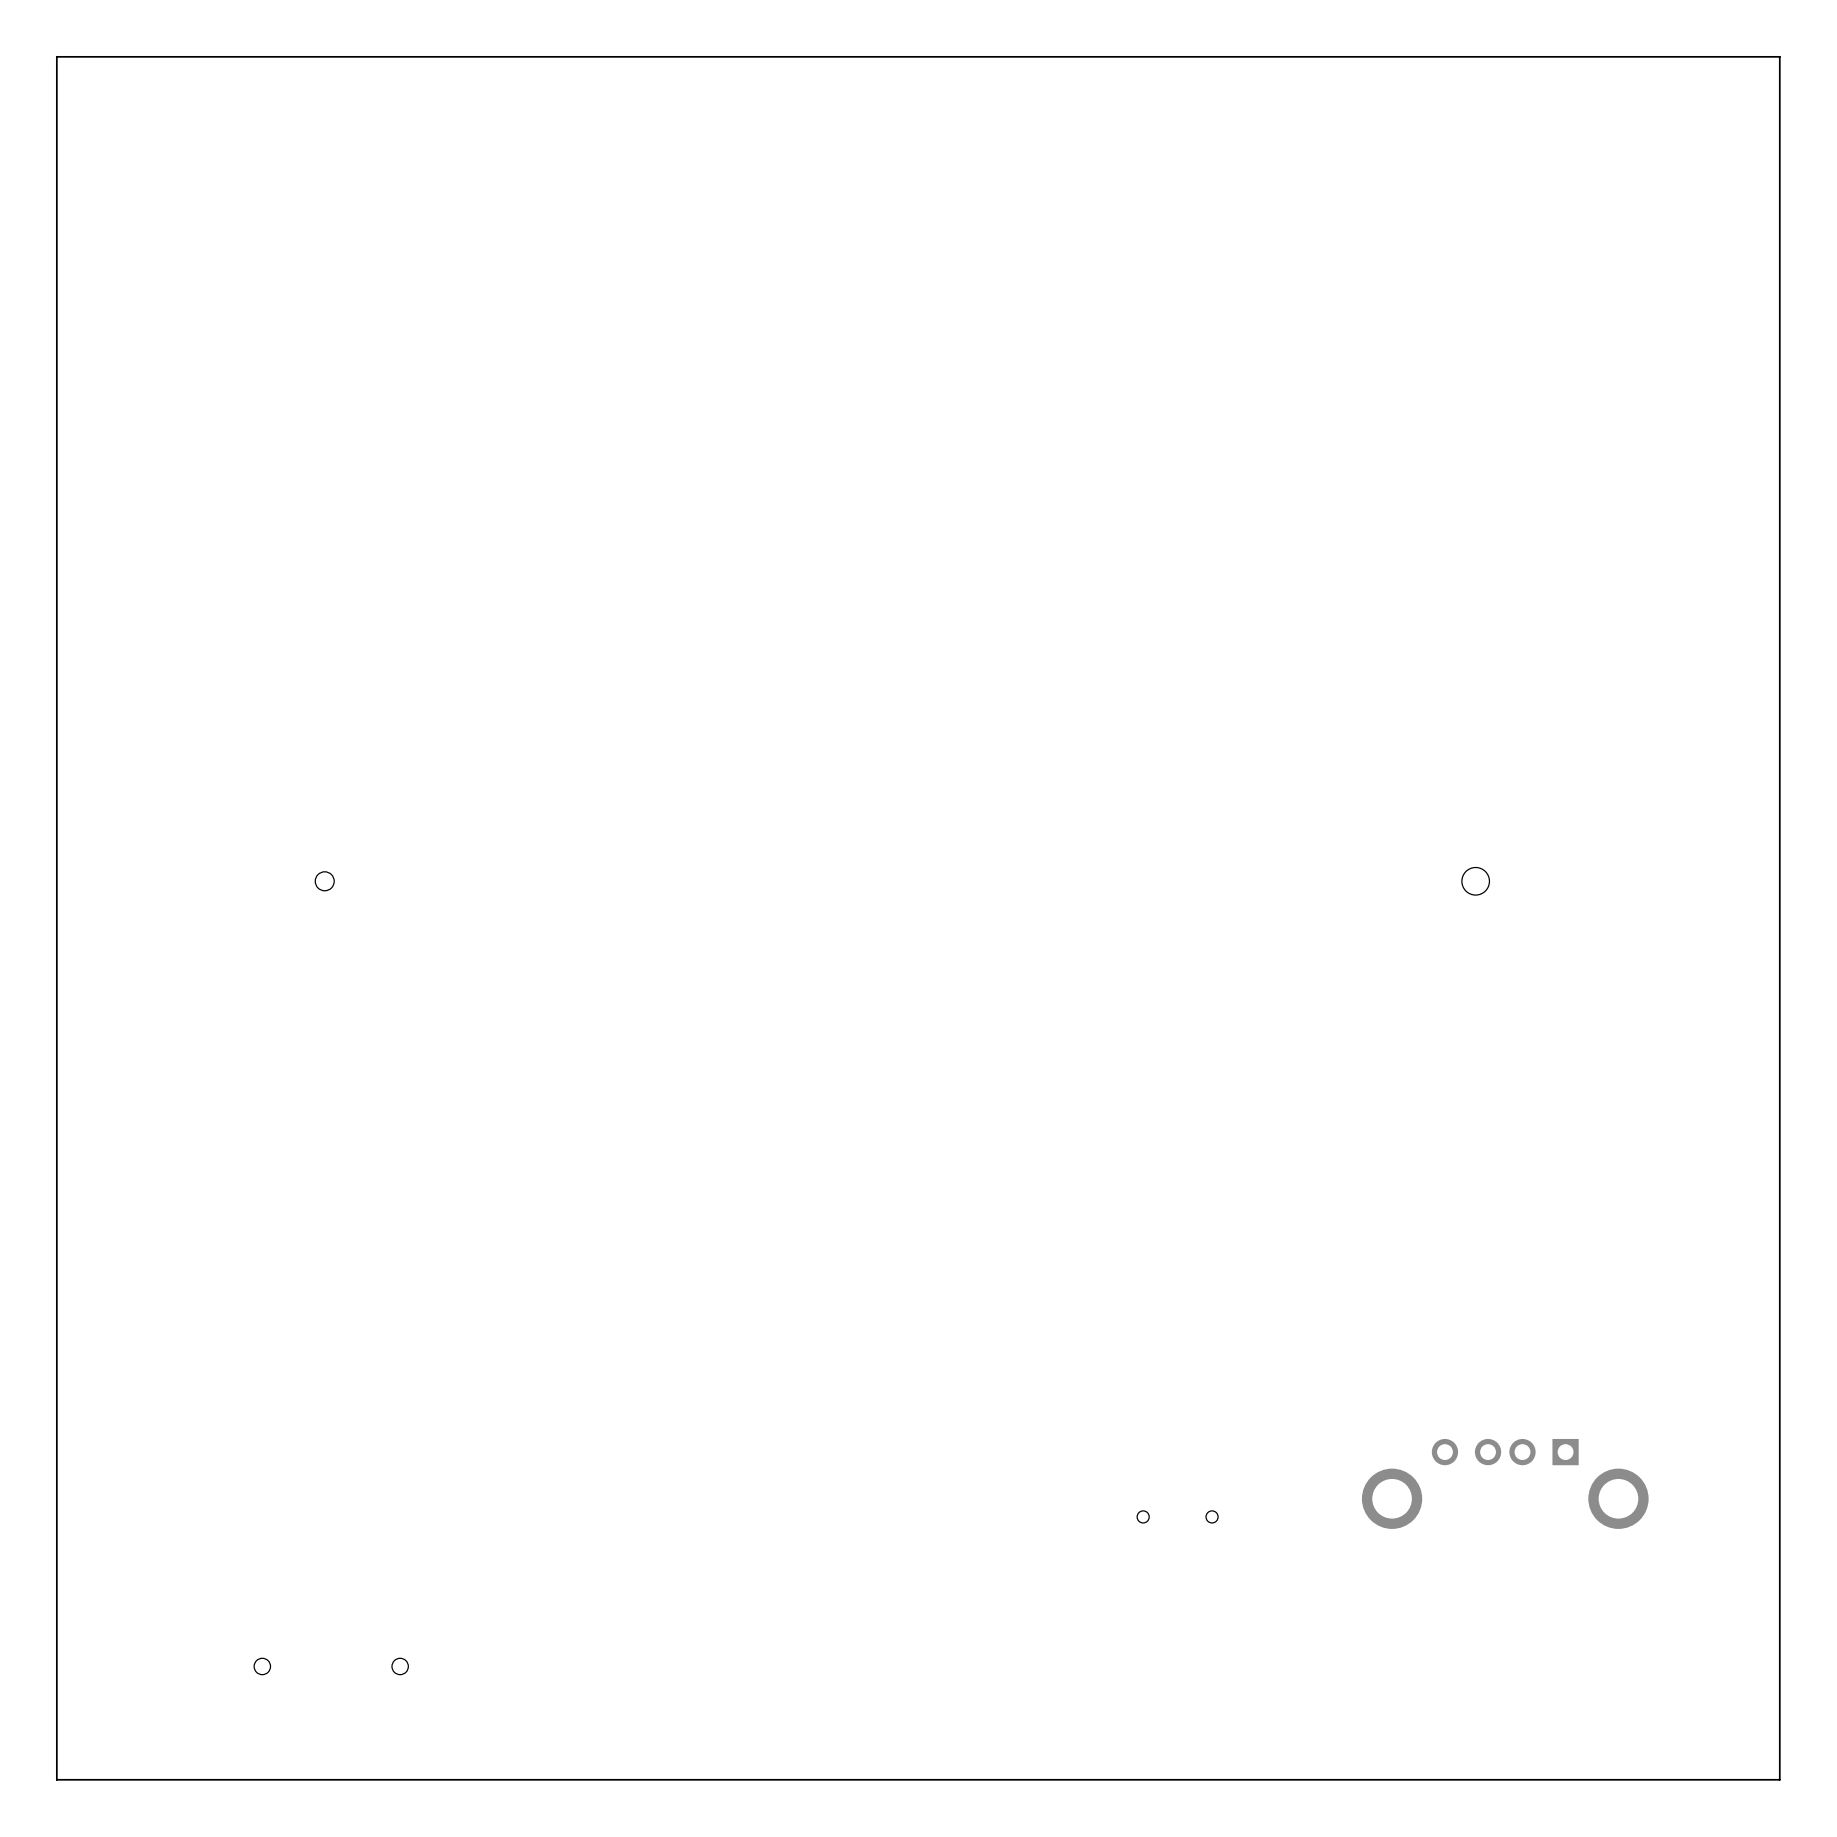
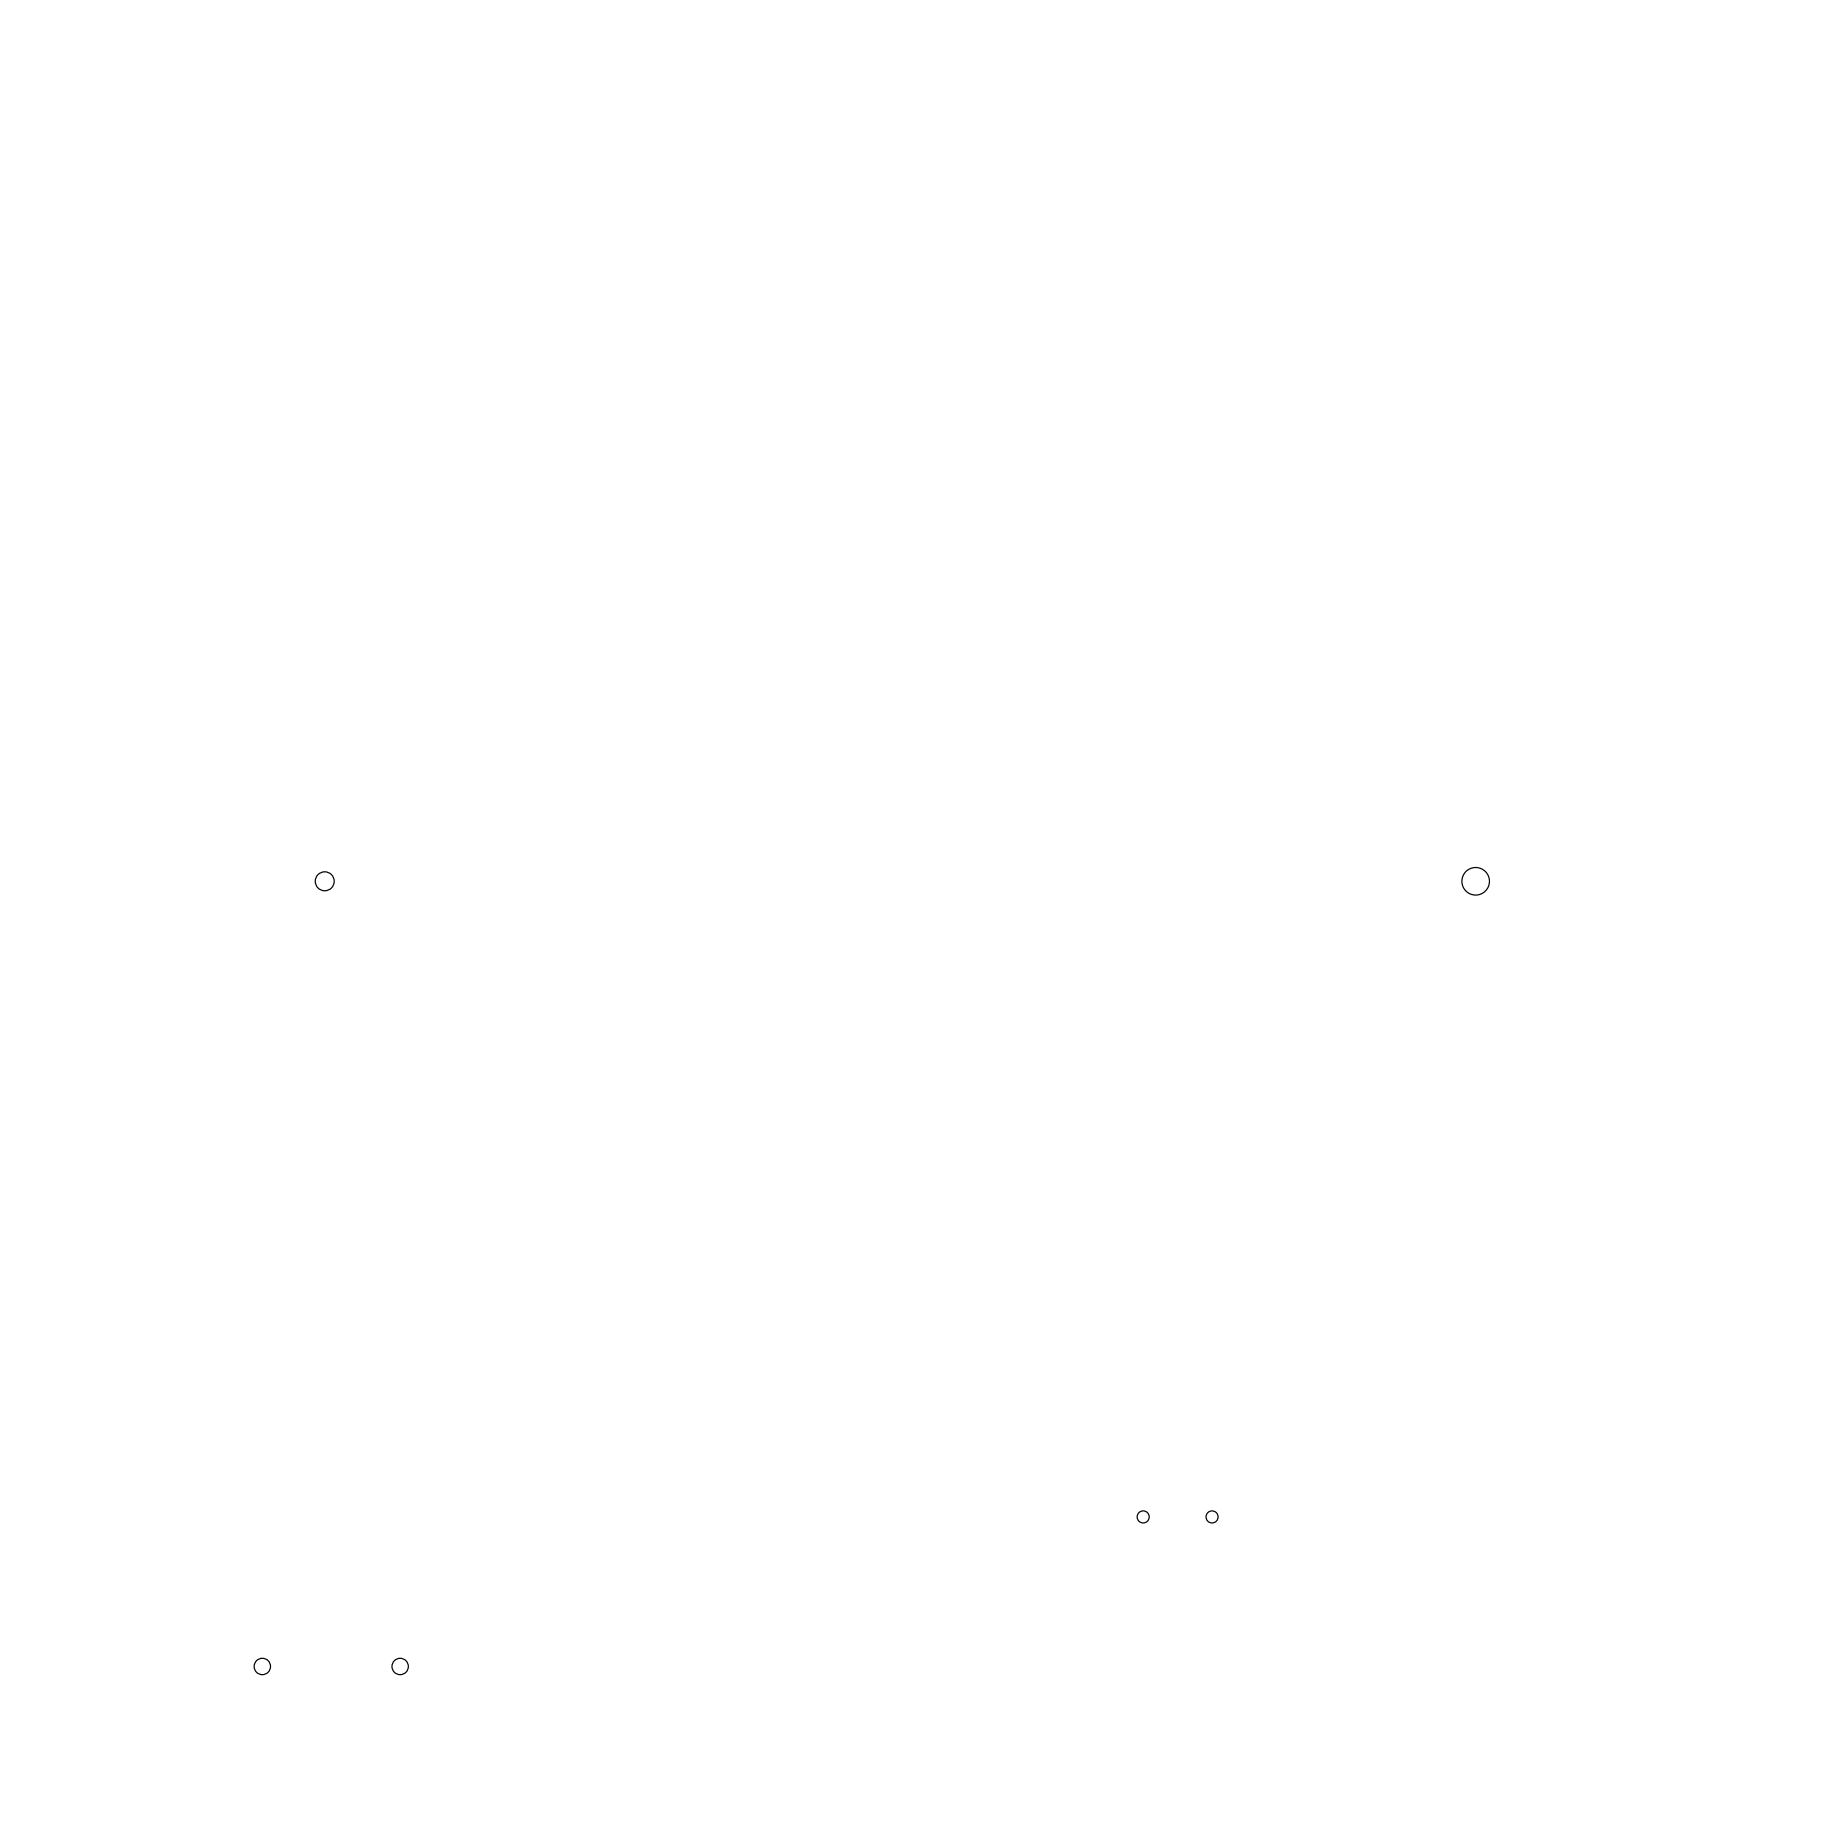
board edge: (1779, 56) (56, 56) (56, 1779) (1779, 1779) (1779, 56) -> none
part: (1505, 1483) -> none

